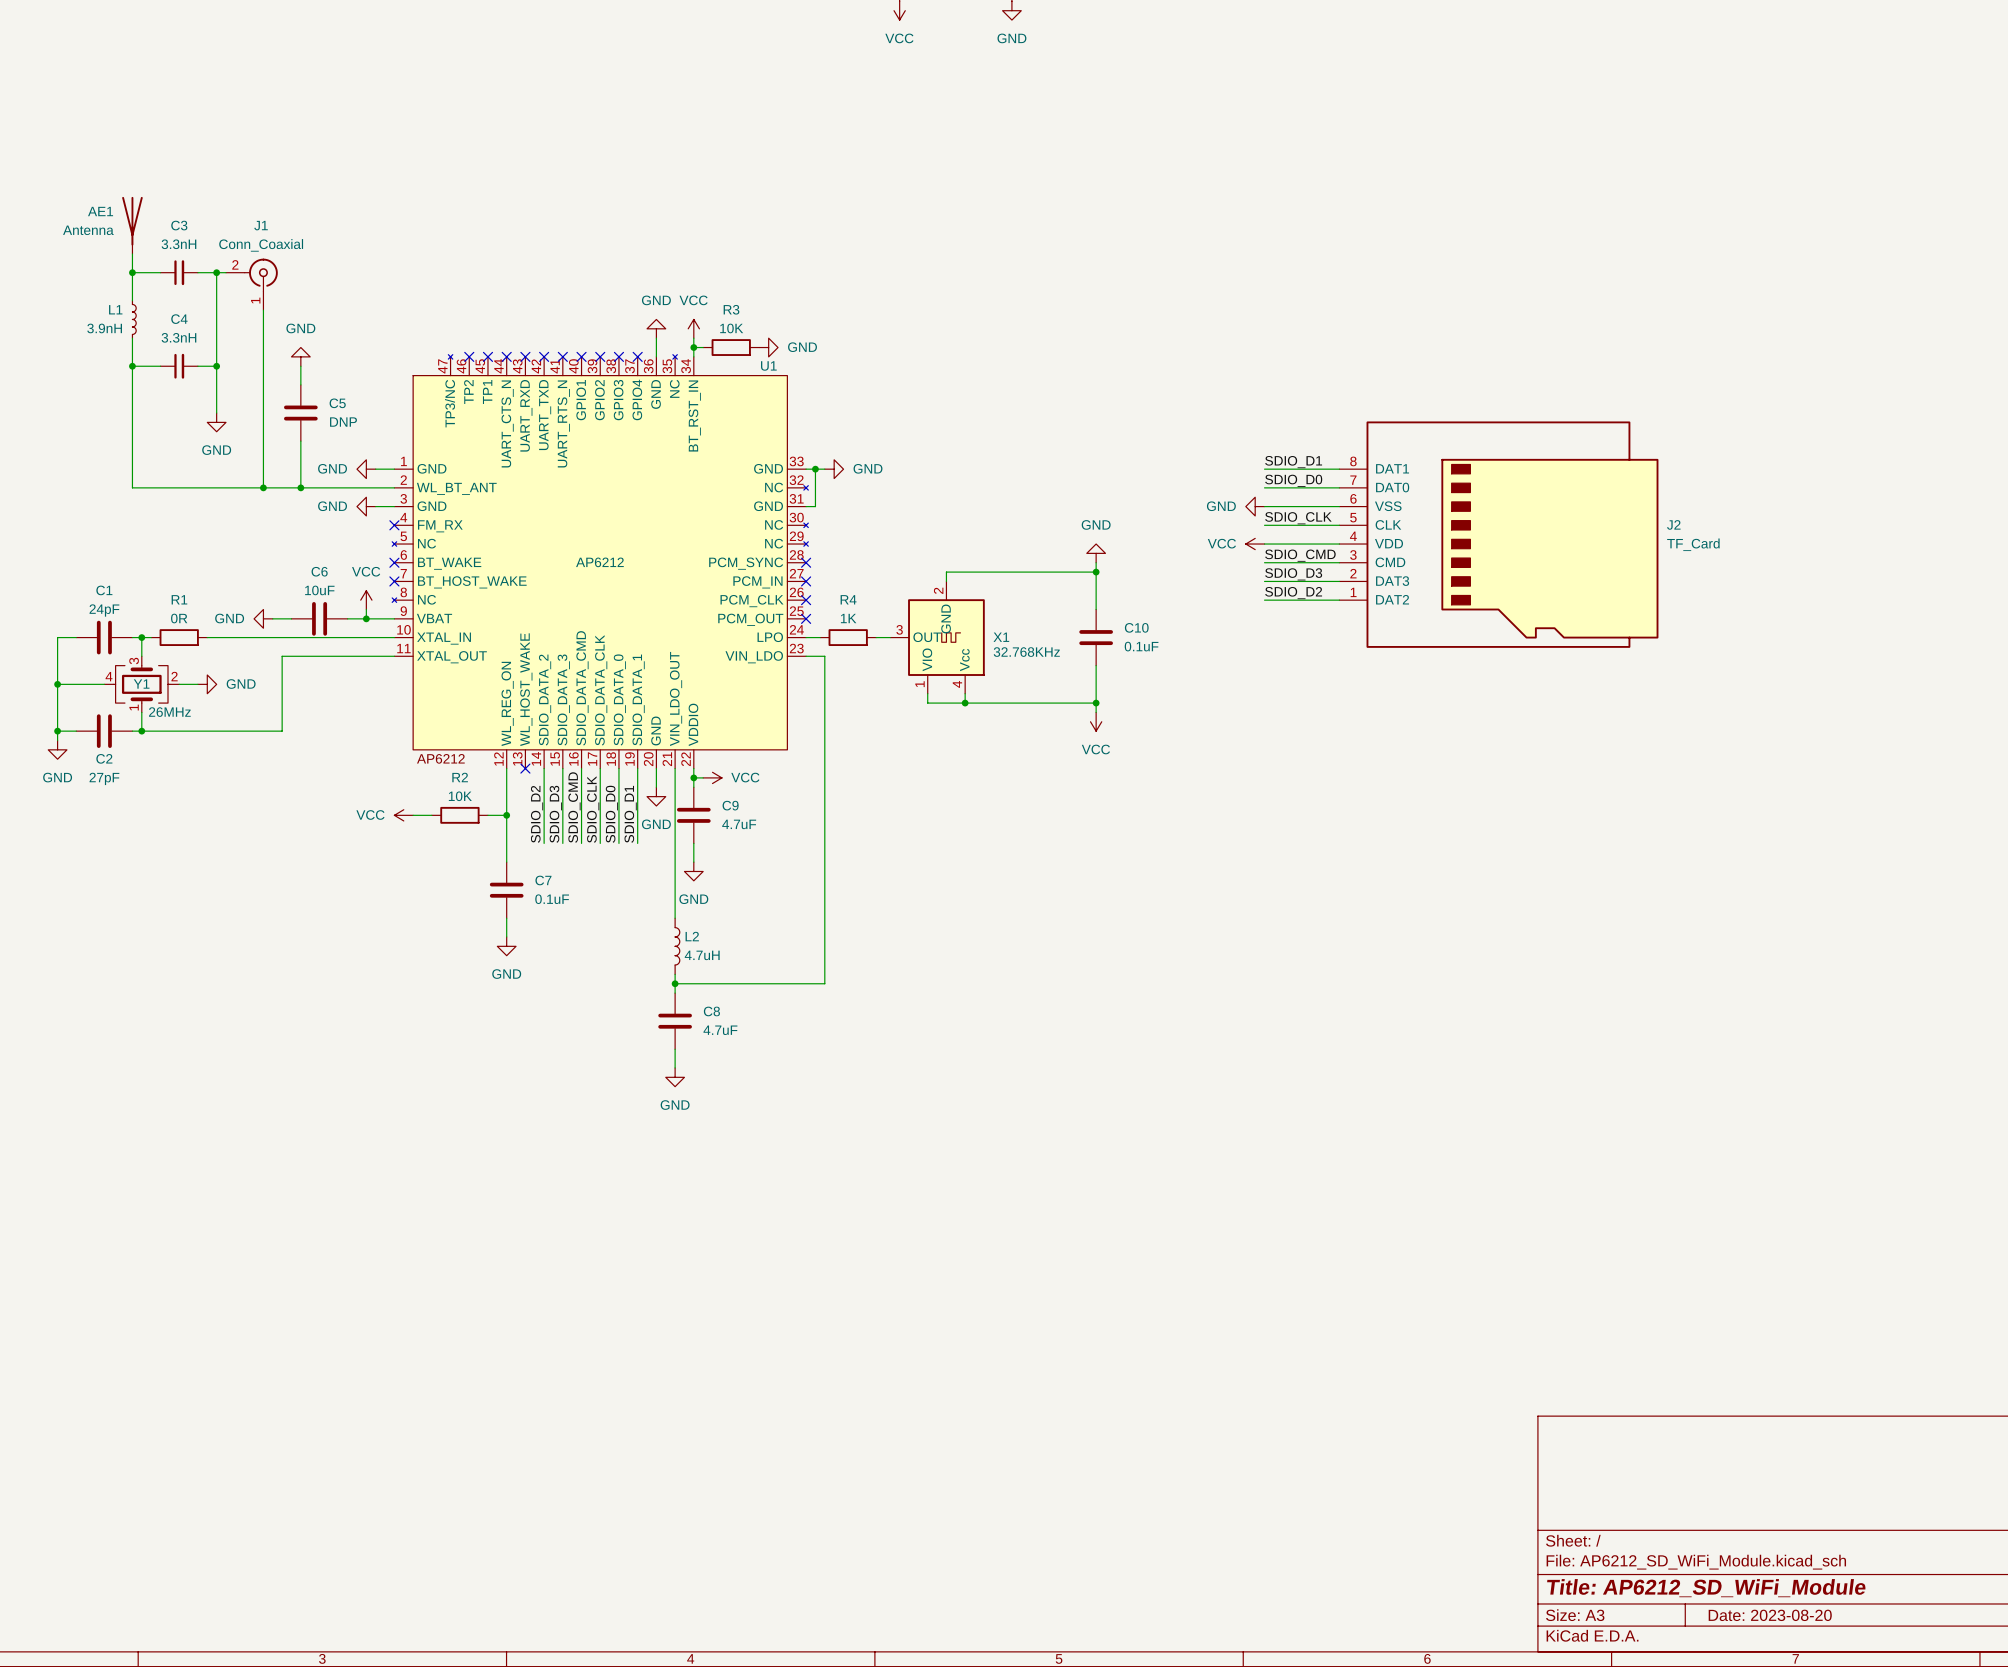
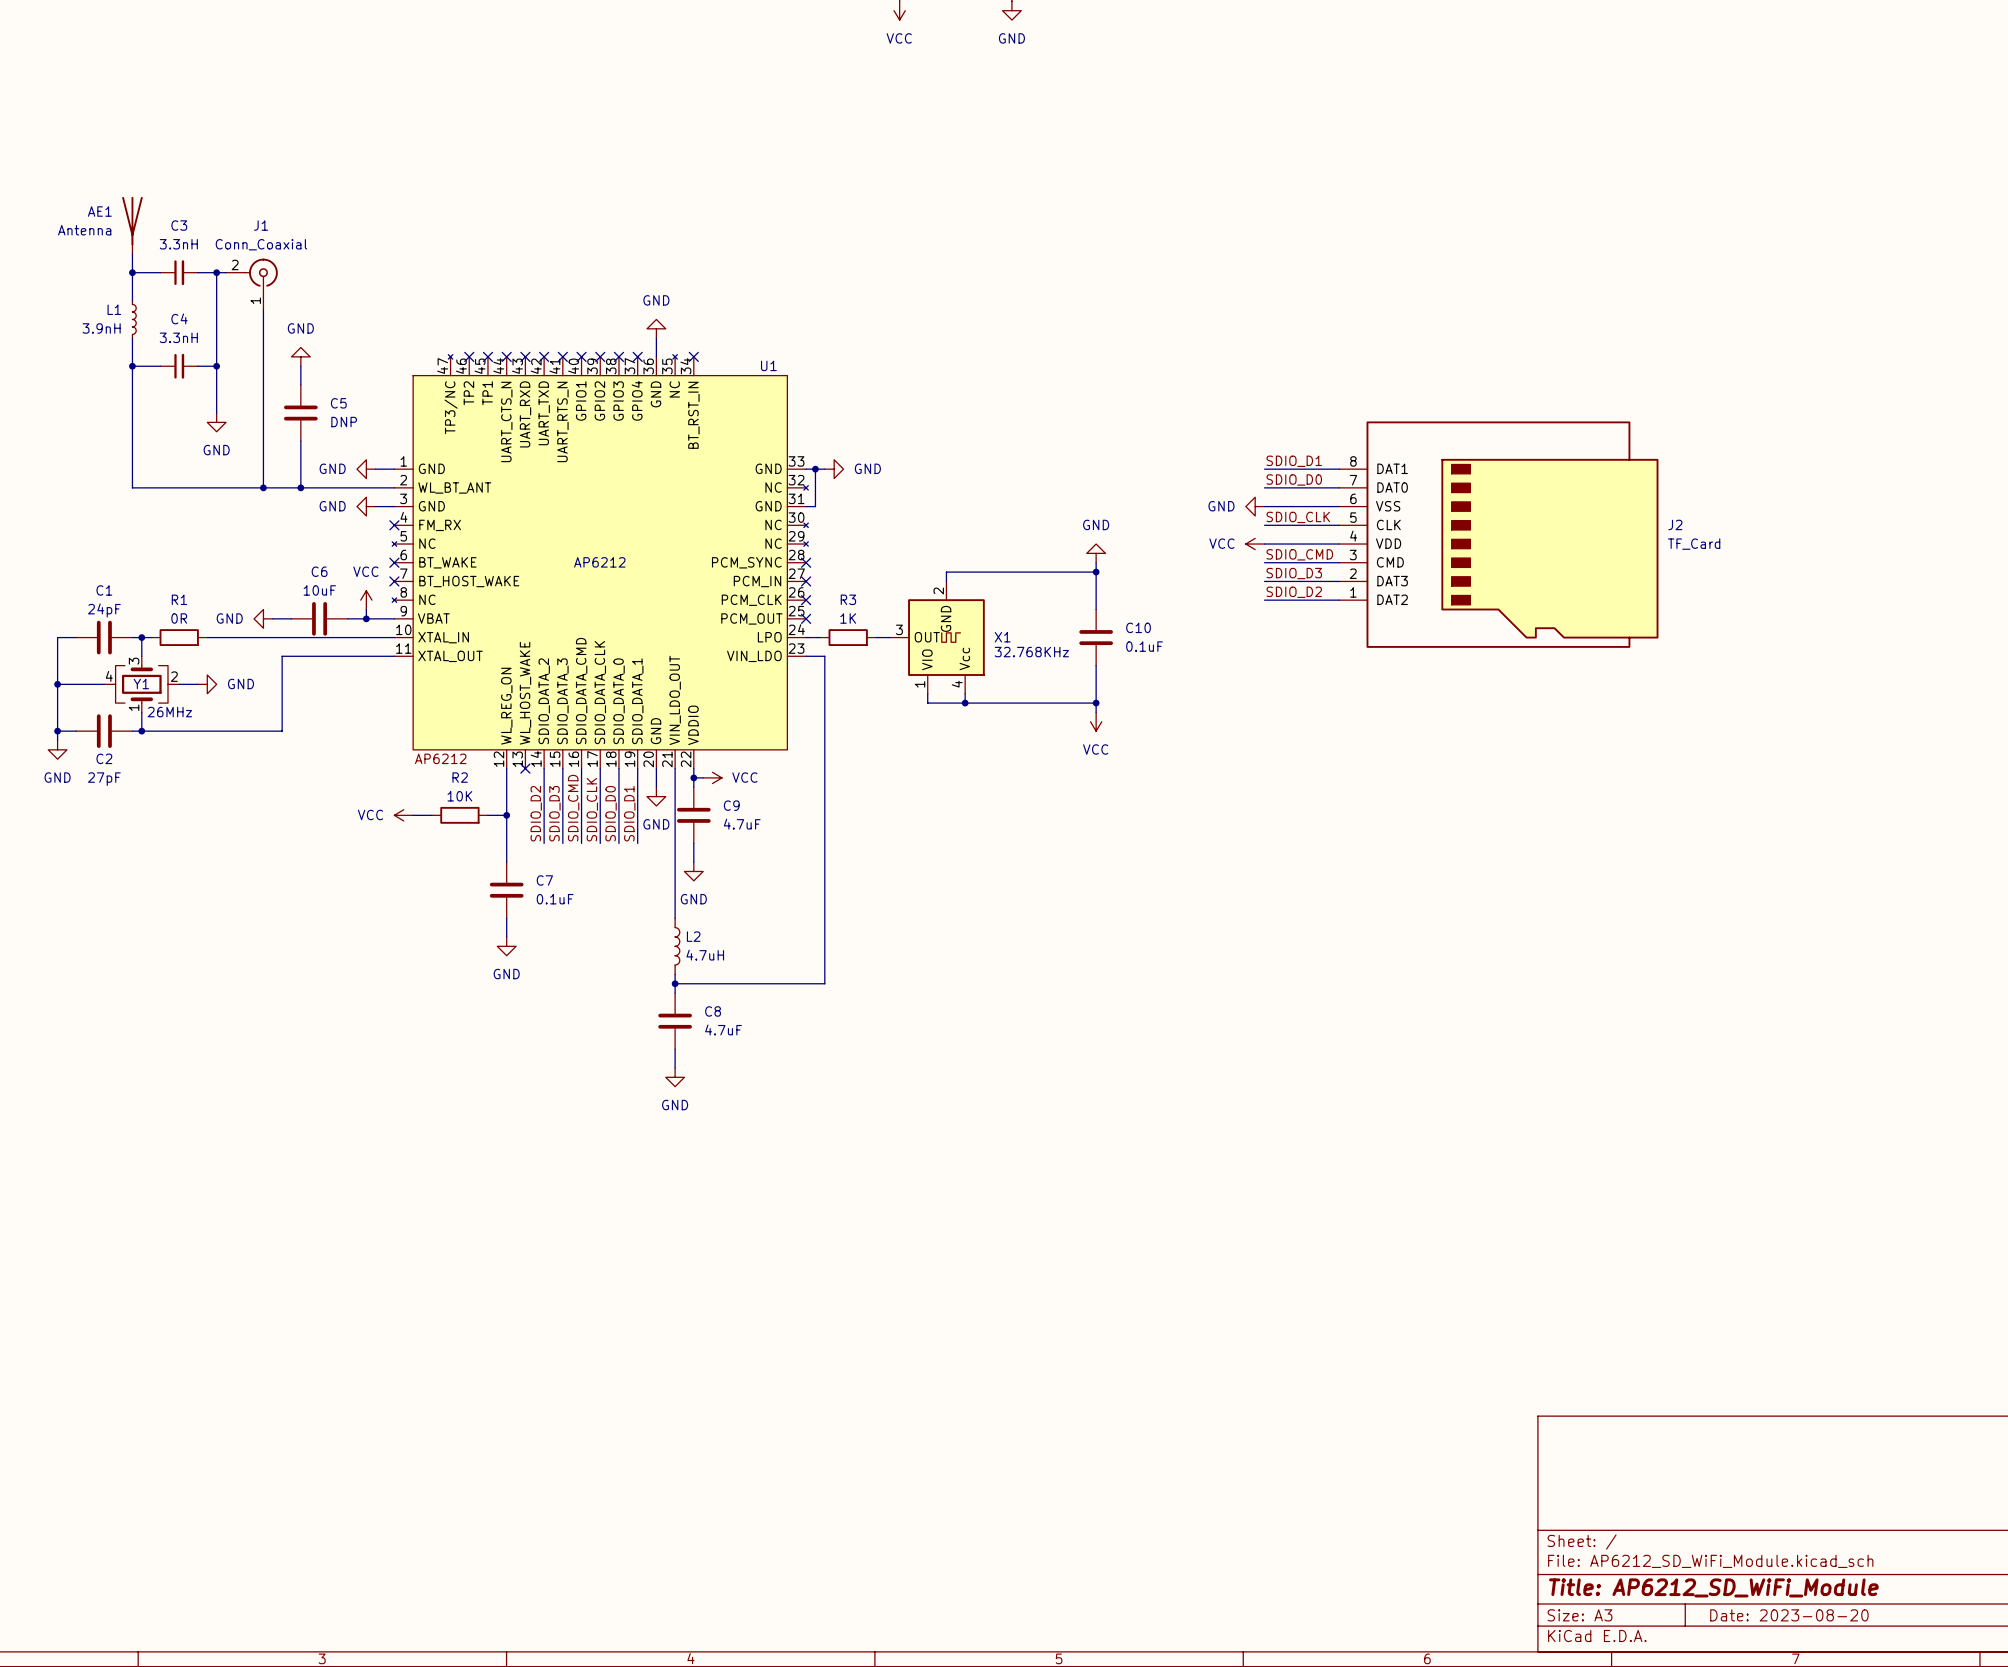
power symbol: VCC (693, 328) -> none
wire: (693, 338) (693, 356) -> none
wire: (693, 347) (703, 347) -> none
junction: (693, 347) -> none
R3: 10K (731, 347) -> none
power symbol: GND (768, 347) -> none
no-connect mark: none -> (693, 356)
R4 name: R4 (848, 599) -> R3 (848, 599)

